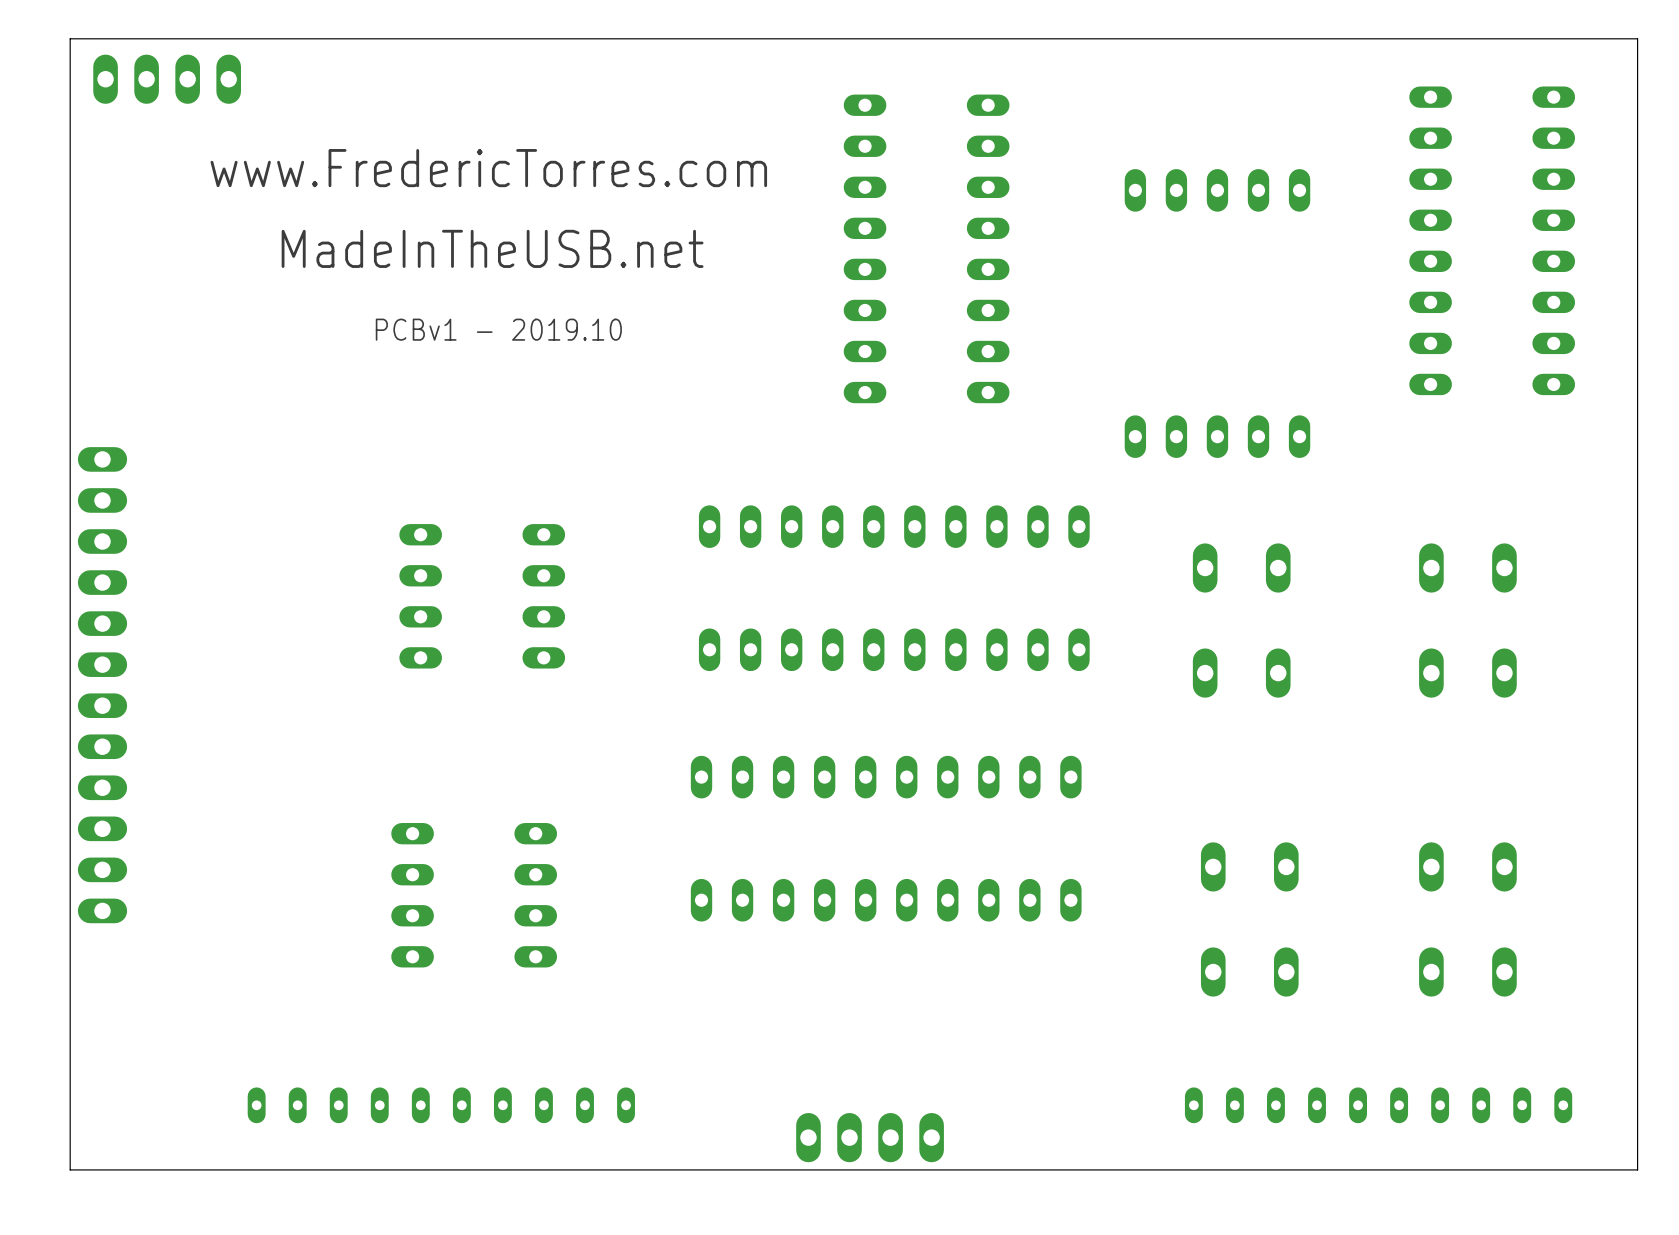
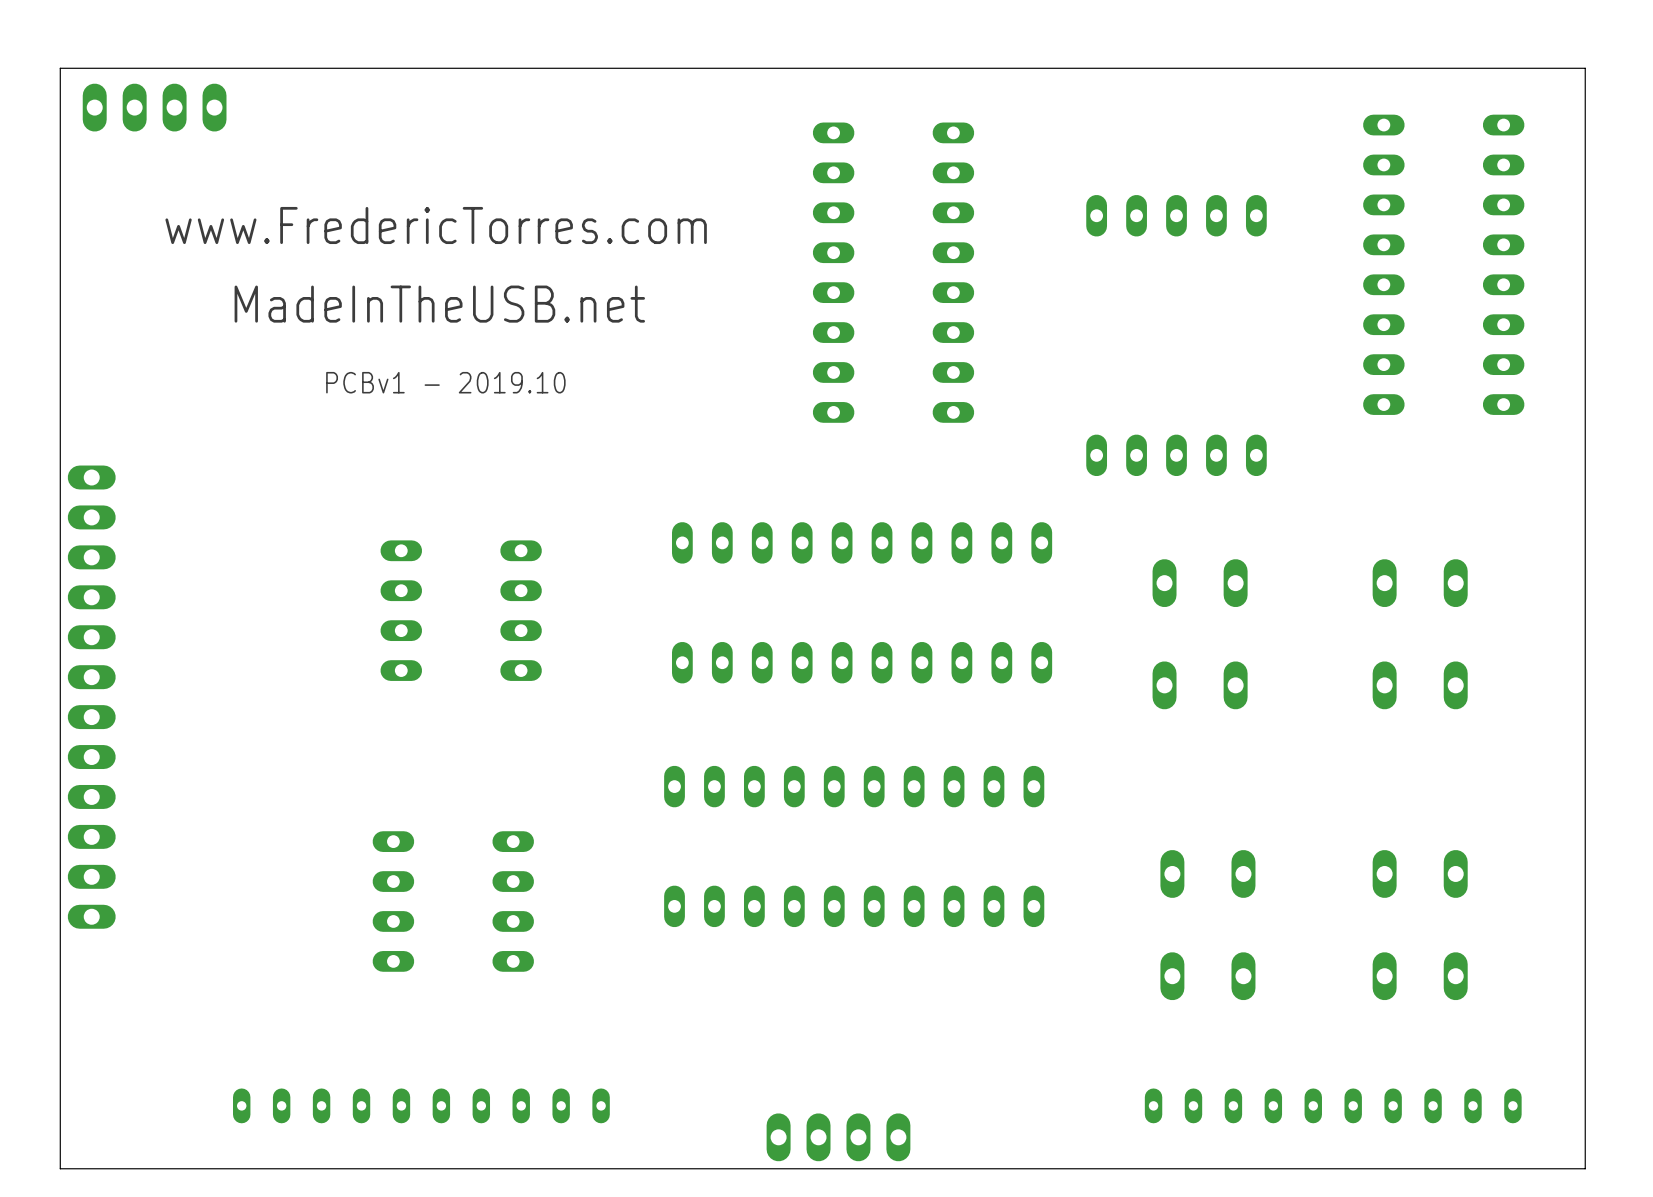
text position: www.FredericTorres.com (488, 168) -> www.FredericTorres.com (436, 225)
text position: MadeInTheUSB.net (492, 248) -> MadeInTheUSB.net (439, 304)
text position: PCBv1 - 2019.10 (498, 329) -> PCBv1 - 2019.10 (445, 382)

